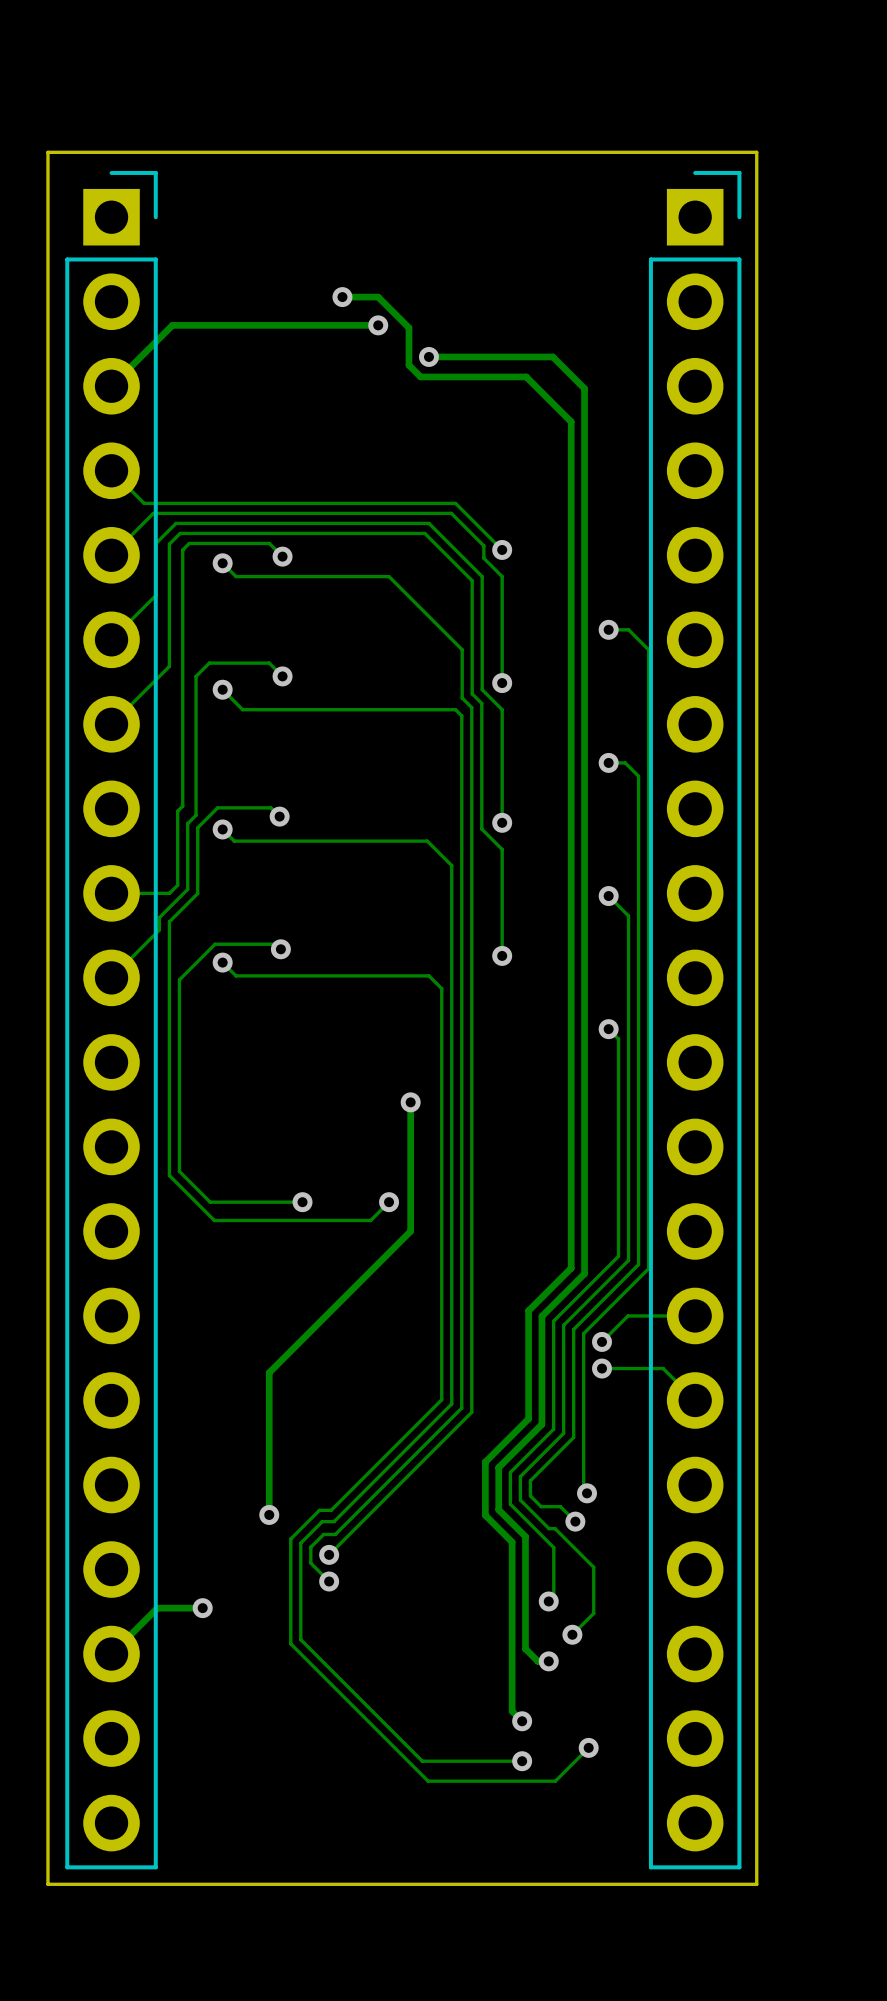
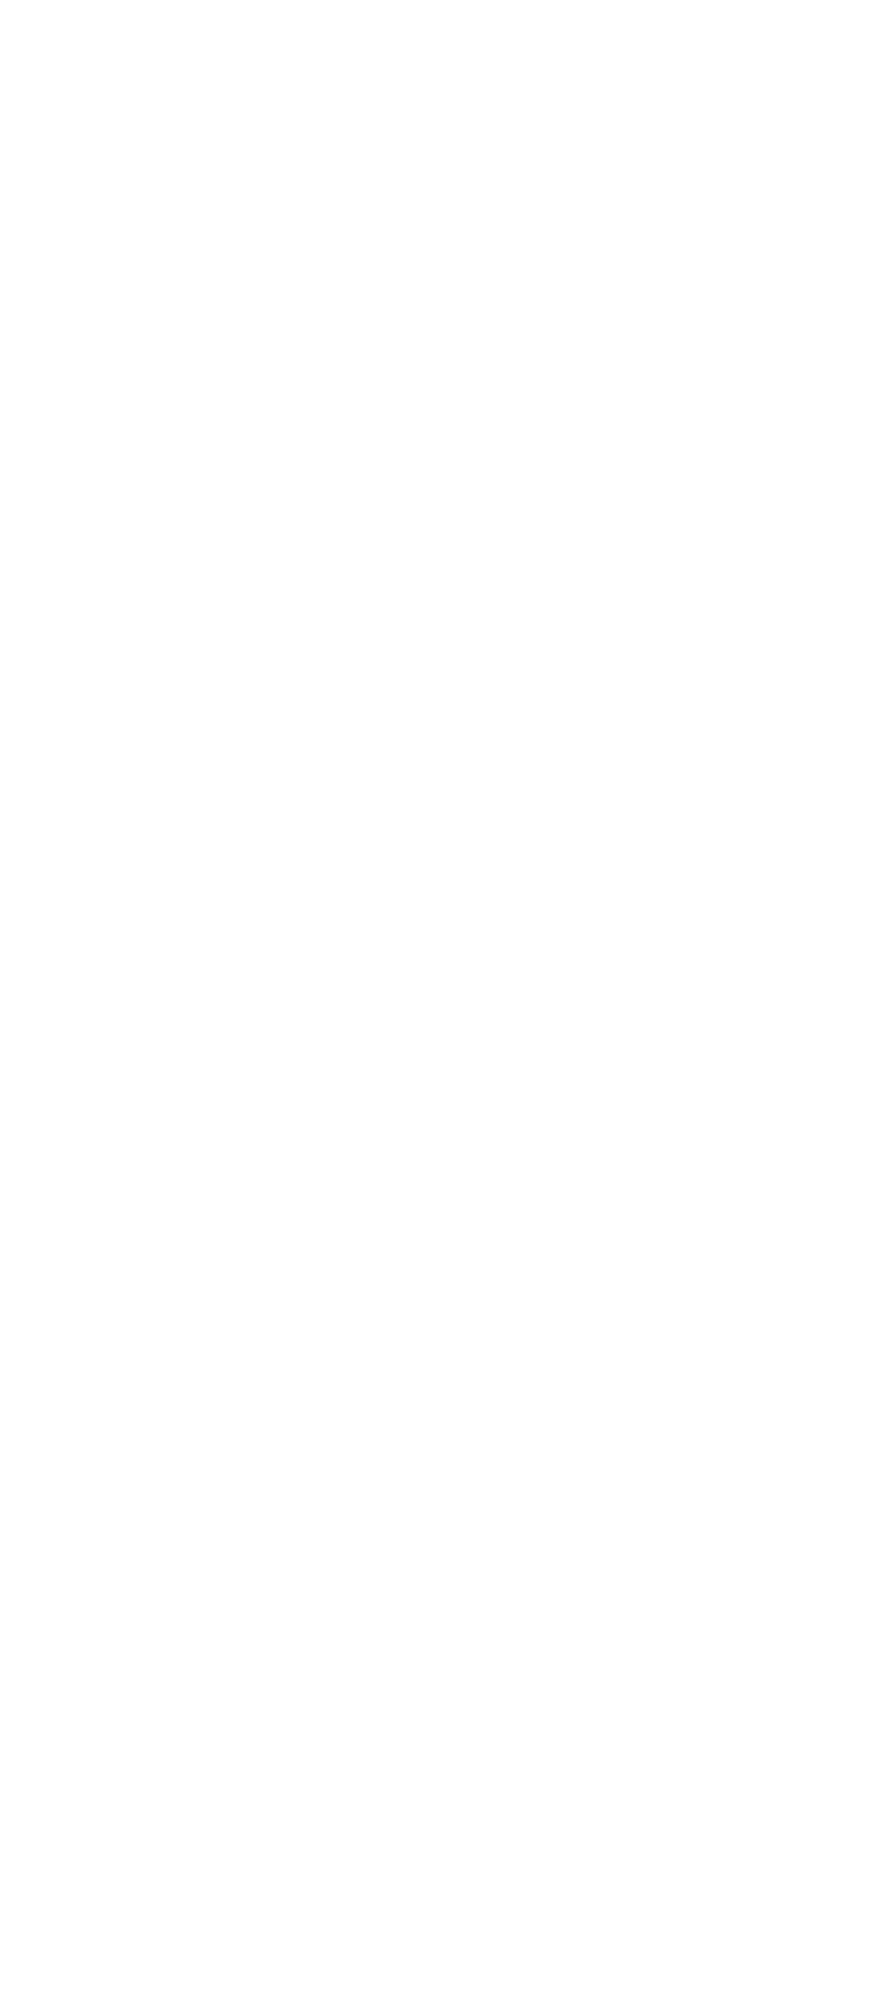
board edge: (756, 152) (47, 152) (47, 1884) (756, 1884) (756, 152) -> none
track: (342, 297) (378, 297) (408, 327) (408, 365) (420, 376) (526, 376) (571, 421) (571, 1268) (528, 1310) (528, 1418) (485, 1462) (485, 1515) (512, 1542) (512, 1711) (522, 1721) -> none
via: (342, 297) -> none
track: (378, 325) (172, 325) (111, 386) -> none
via: (378, 325) -> none
track: (428, 356) (552, 356) (584, 388) (584, 1273) (541, 1316) (541, 1424) (498, 1467) (498, 1509) (525, 1536) (525, 1648) (537, 1661) (548, 1661) -> none
via: (428, 356) -> none
track: (111, 470) (144, 503) (455, 503) (502, 549) -> none
via: (502, 549) -> none
track: (111, 555) (153, 513) (451, 513) (483, 545) (483, 558) (502, 576) (502, 683) -> none
track: (282, 556) (269, 543) (189, 543) (182, 549) (182, 806) (177, 811) (177, 885) (169, 893) (111, 893) -> none
via: (282, 556) -> none
track: (222, 563) (235, 576) (389, 576) (462, 649) (462, 698) (471, 707) (471, 1412) (329, 1554) -> none
via: (222, 563) -> none
track: (608, 629) (628, 629) (648, 649) (648, 1268) (583, 1333) (583, 1489) (587, 1493) -> none
via: (608, 629) -> none
track: (111, 639) (156, 595) (156, 543) (176, 523) (429, 523) (482, 576) (482, 689) (502, 709) (502, 822) -> none
track: (282, 676) (269, 663) (209, 663) (196, 676) (196, 815) (187, 823) (187, 889) (159, 917) (159, 930) (111, 977) -> none
via: (282, 676) -> none
via: (502, 683) -> none
track: (222, 689) (242, 709) (455, 709) (461, 715) (461, 1408) (335, 1534) (323, 1534) (310, 1547) (310, 1563) (329, 1581) -> none
via: (222, 689) -> none
track: (111, 724) (169, 666) (169, 544) (180, 533) (424, 533) (472, 580) (472, 693) (481, 703) (481, 829) (502, 849) (502, 955) -> none
track: (608, 762) (625, 762) (638, 776) (638, 1264) (573, 1329) (573, 1437) (530, 1480) (530, 1495) (541, 1506) (560, 1506) (575, 1521) -> none
via: (608, 762) -> none
track: (279, 816) (270, 807) (217, 807) (197, 827) (197, 893) (169, 921) (169, 1175) (214, 1220) (370, 1220) (389, 1202) -> none
via: (279, 816) -> none
via: (502, 822) -> none
track: (222, 829) (234, 841) (427, 841) (451, 865) (451, 1403) (334, 1521) (322, 1521) (300, 1543) (300, 1639) (422, 1761) (522, 1761) -> none
via: (222, 829) -> none
track: (608, 896) (628, 915) (628, 1260) (563, 1325) (563, 1433) (520, 1476) (520, 1500) (548, 1528) (555, 1528) (593, 1567) (593, 1613) (572, 1634) -> none
via: (608, 896) -> none
track: (280, 949) (275, 944) (215, 944) (179, 979) (179, 1171) (210, 1202) (302, 1202) -> none
via: (280, 949) -> none
via: (502, 955) -> none
track: (222, 962) (235, 975) (428, 975) (441, 988) (441, 1399) (331, 1510) (319, 1510) (290, 1539) (290, 1643) (428, 1781) (555, 1781) (588, 1747) -> none
via: (222, 962) -> none
part: (111, 1020) -> none
part: (695, 1020) -> none
track: (608, 1029) (618, 1039) (618, 1256) (553, 1321) (553, 1429) (510, 1472) (510, 1504) (553, 1547) (553, 1596) (548, 1601) -> none
via: (608, 1029) -> none
track: (410, 1102) (410, 1231) (269, 1372) (269, 1514) -> none
via: (410, 1102) -> none
via: (302, 1202) -> none
via: (389, 1202) -> none
track: (695, 1315) (627, 1315) (602, 1341) -> none
via: (602, 1341) -> none
track: (602, 1368) (663, 1368) (695, 1400) -> none
via: (602, 1368) -> none
via: (587, 1493) -> none
via: (269, 1514) -> none
via: (575, 1521) -> none
via: (329, 1554) -> none
via: (329, 1581) -> none
via: (548, 1601) -> none
track: (202, 1608) (157, 1608) (111, 1654) -> none
via: (202, 1608) -> none
via: (572, 1634) -> none
via: (548, 1661) -> none
via: (522, 1721) -> none
via: (588, 1747) -> none
via: (522, 1761) -> none

